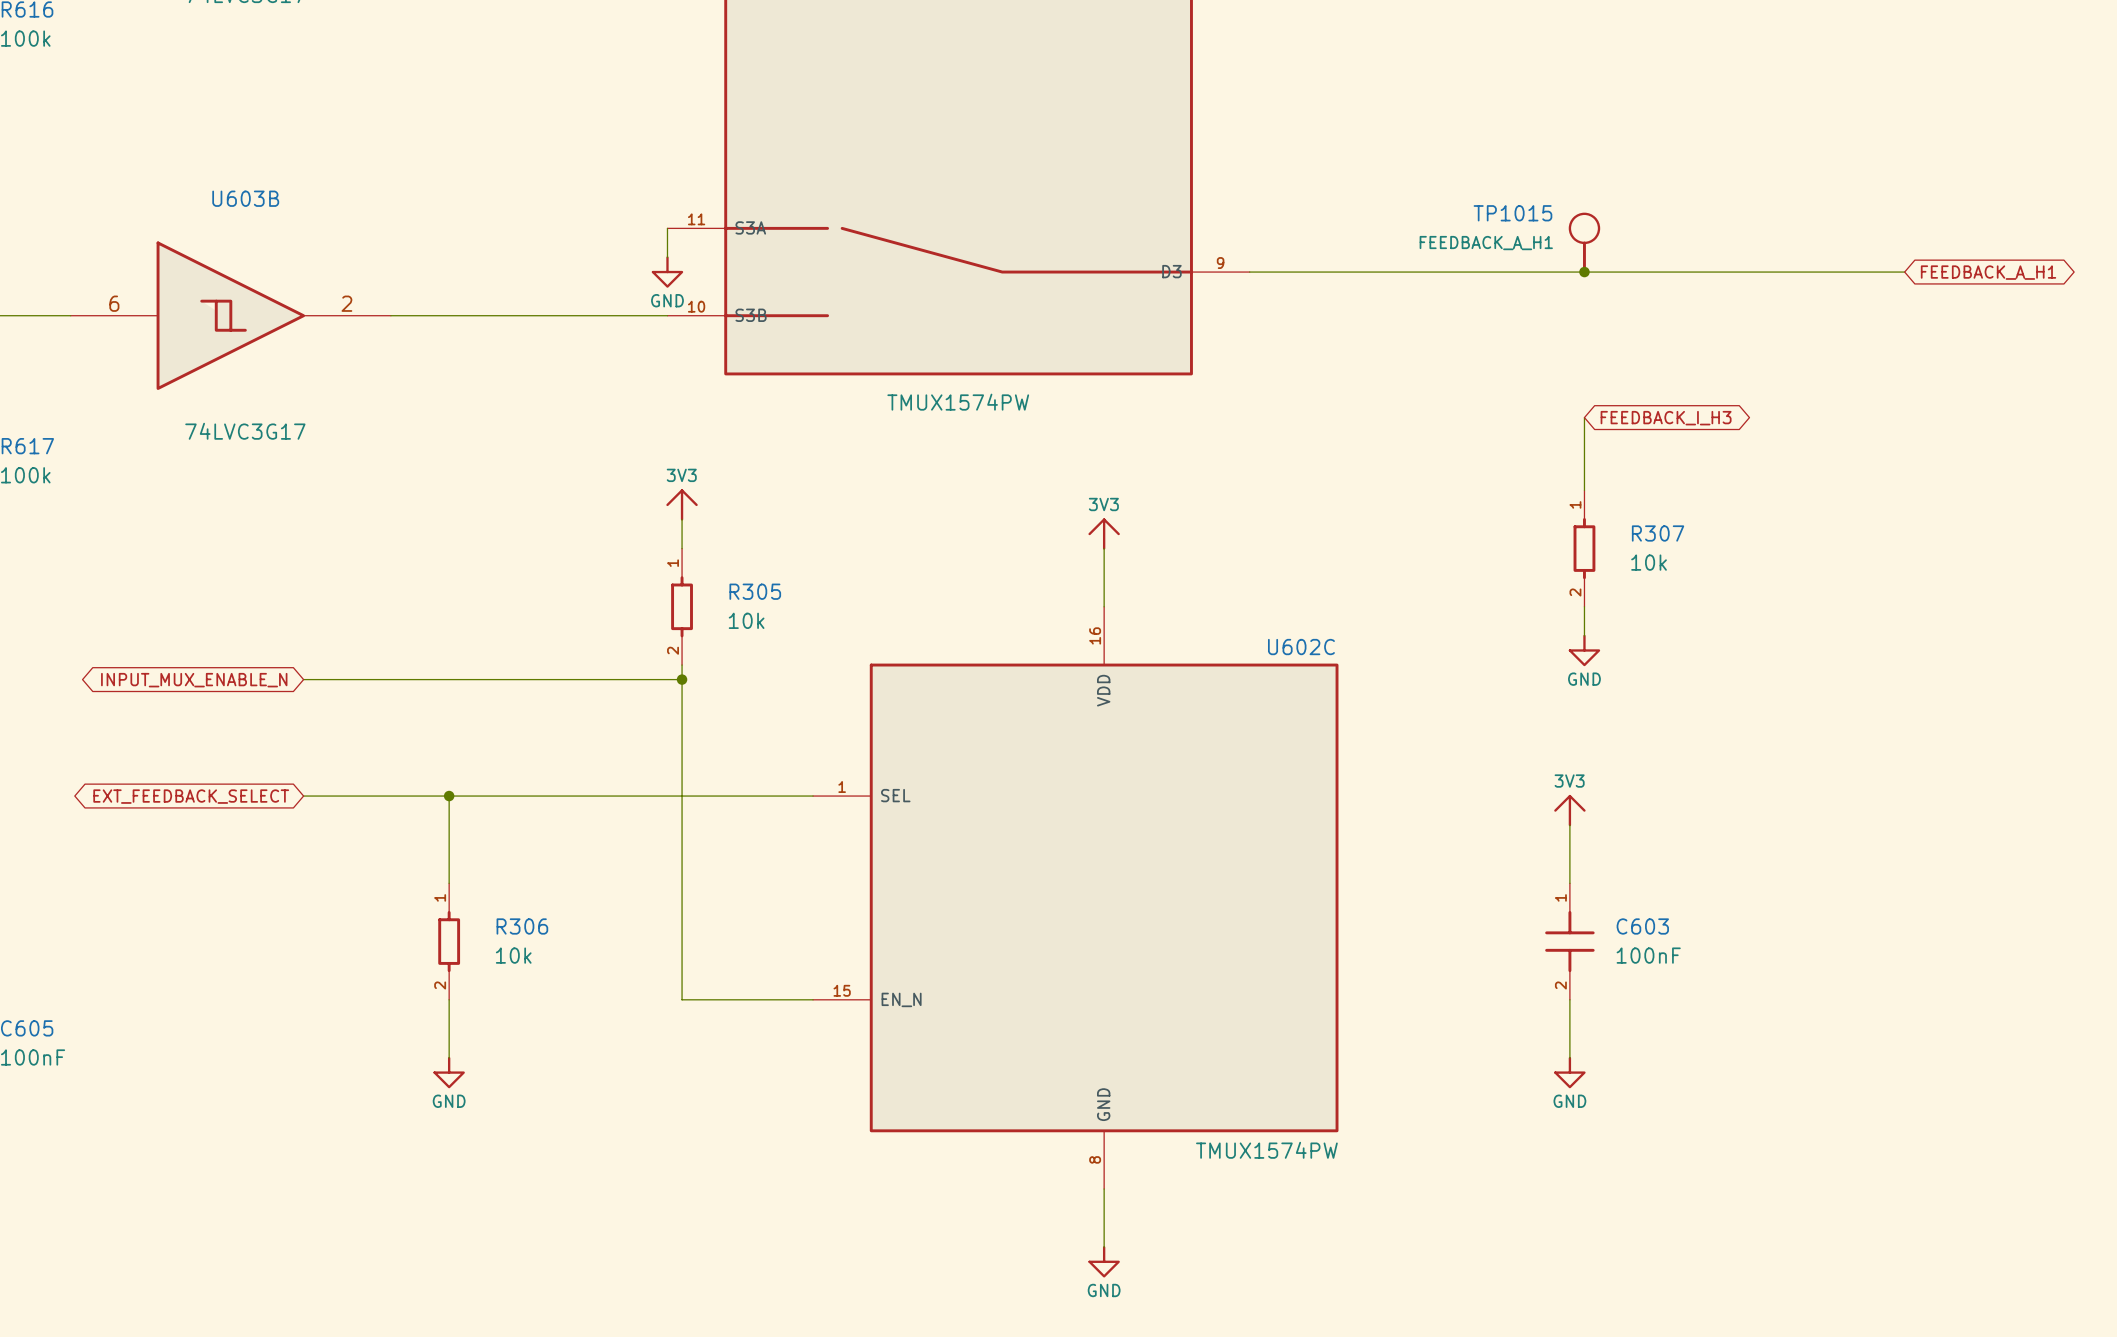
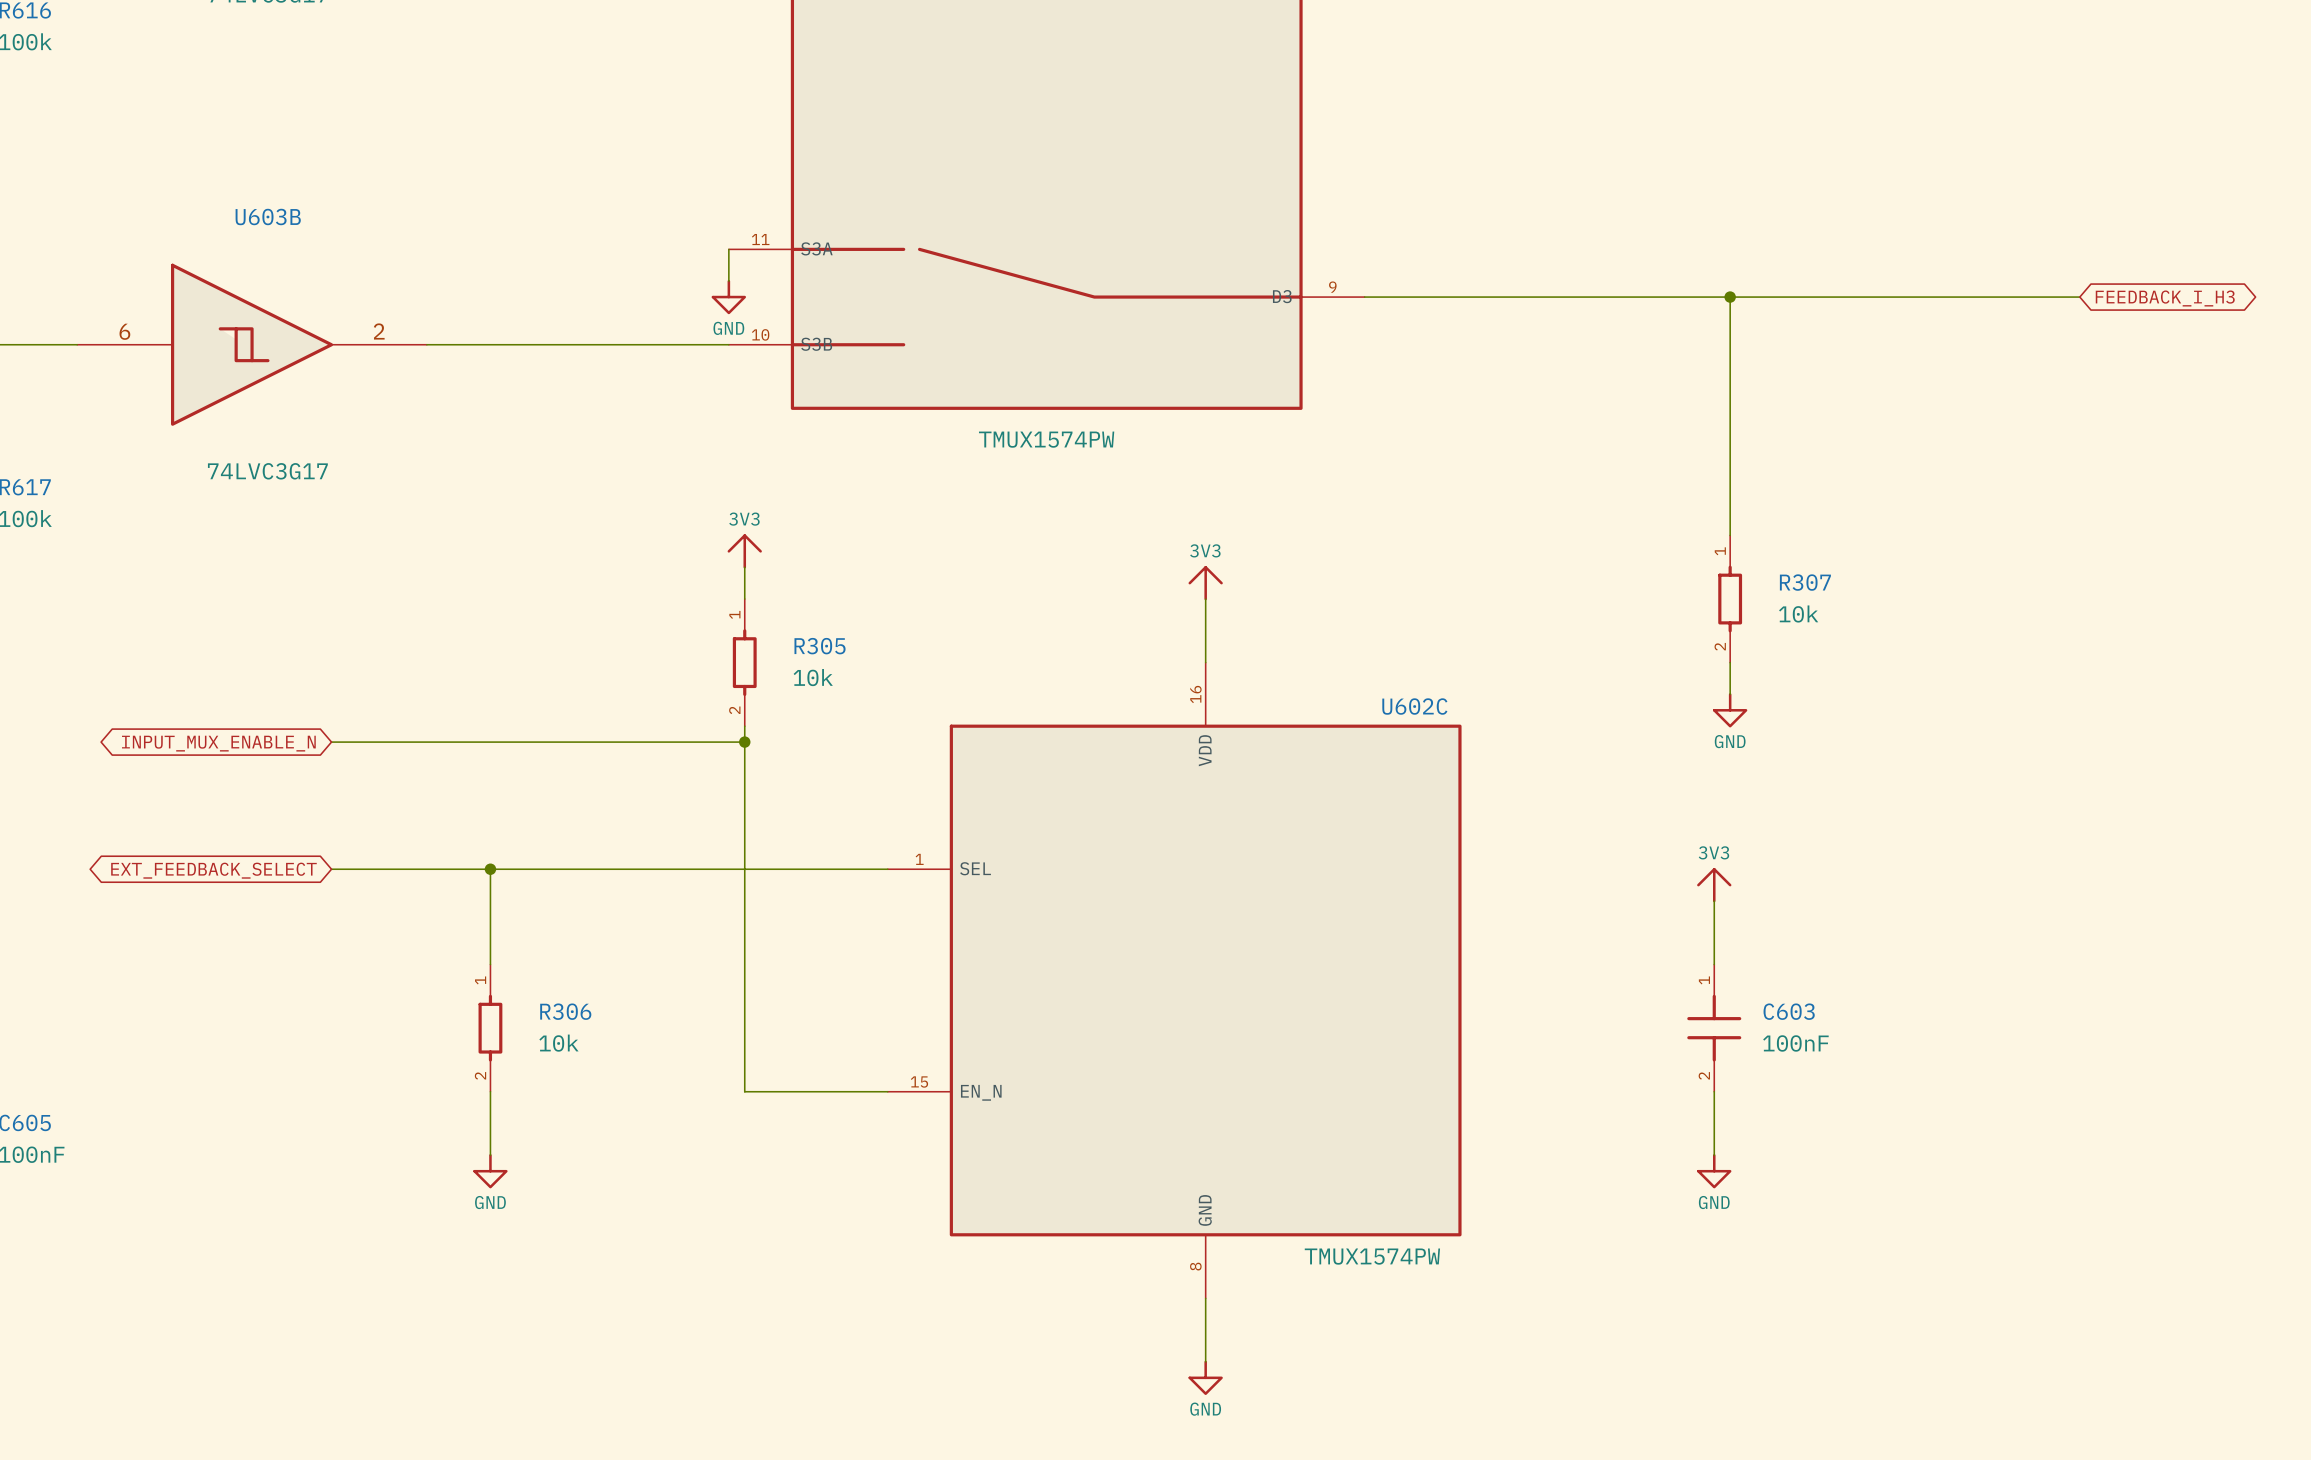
TP1015: FEEDBACK_A_H1 (1584, 243) -> none
wire: none -> (1730, 297) (1730, 456)
global label: FEEDBACK_A_H1 (1988, 272) -> FEEDBACK_I_H3 (2165, 298)
global label: FEEDBACK_I_H3 (1666, 418) -> none

